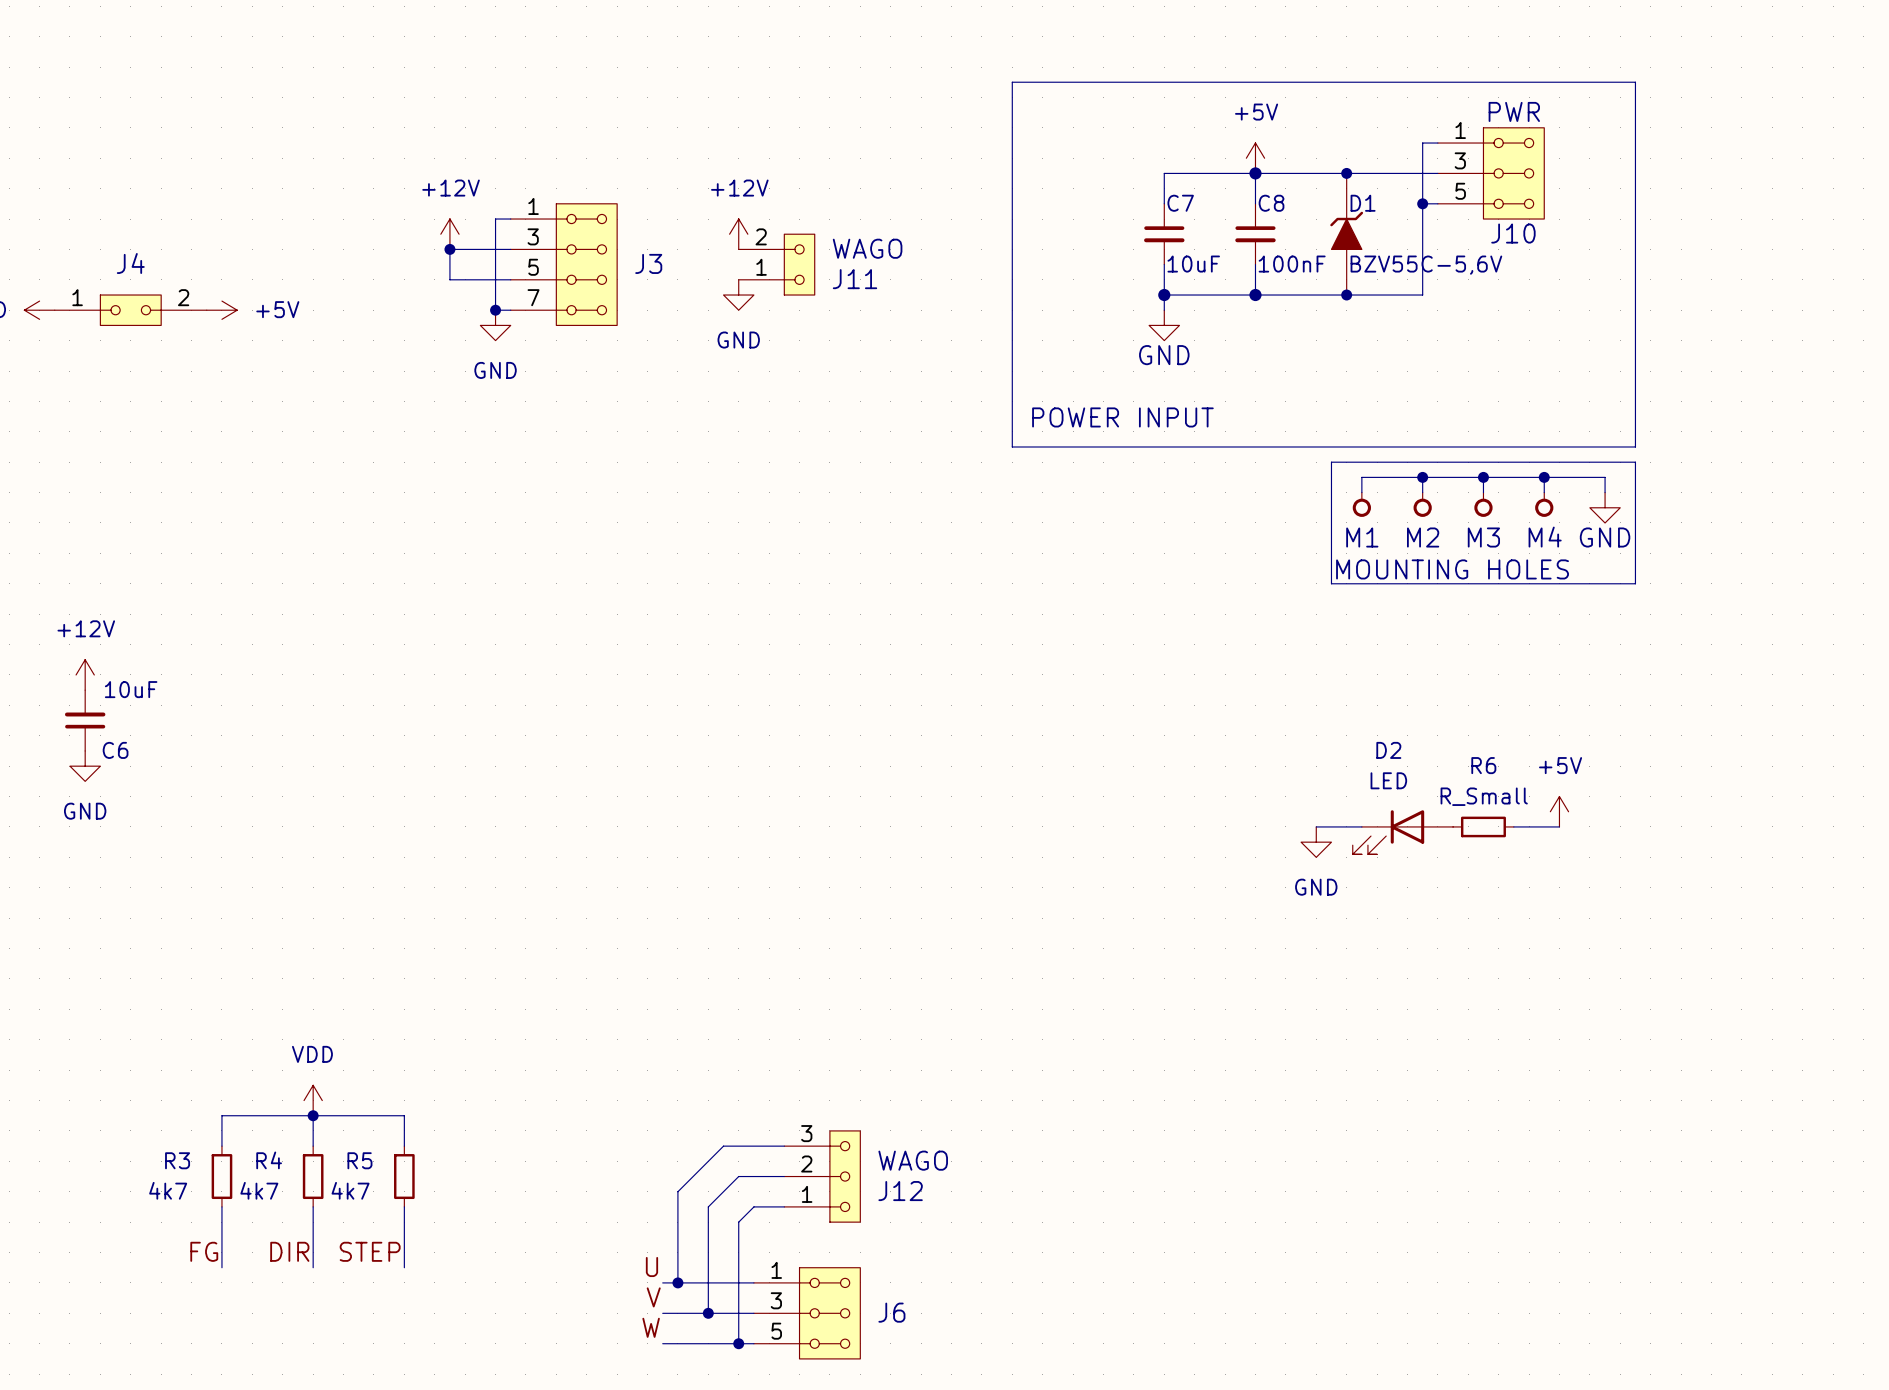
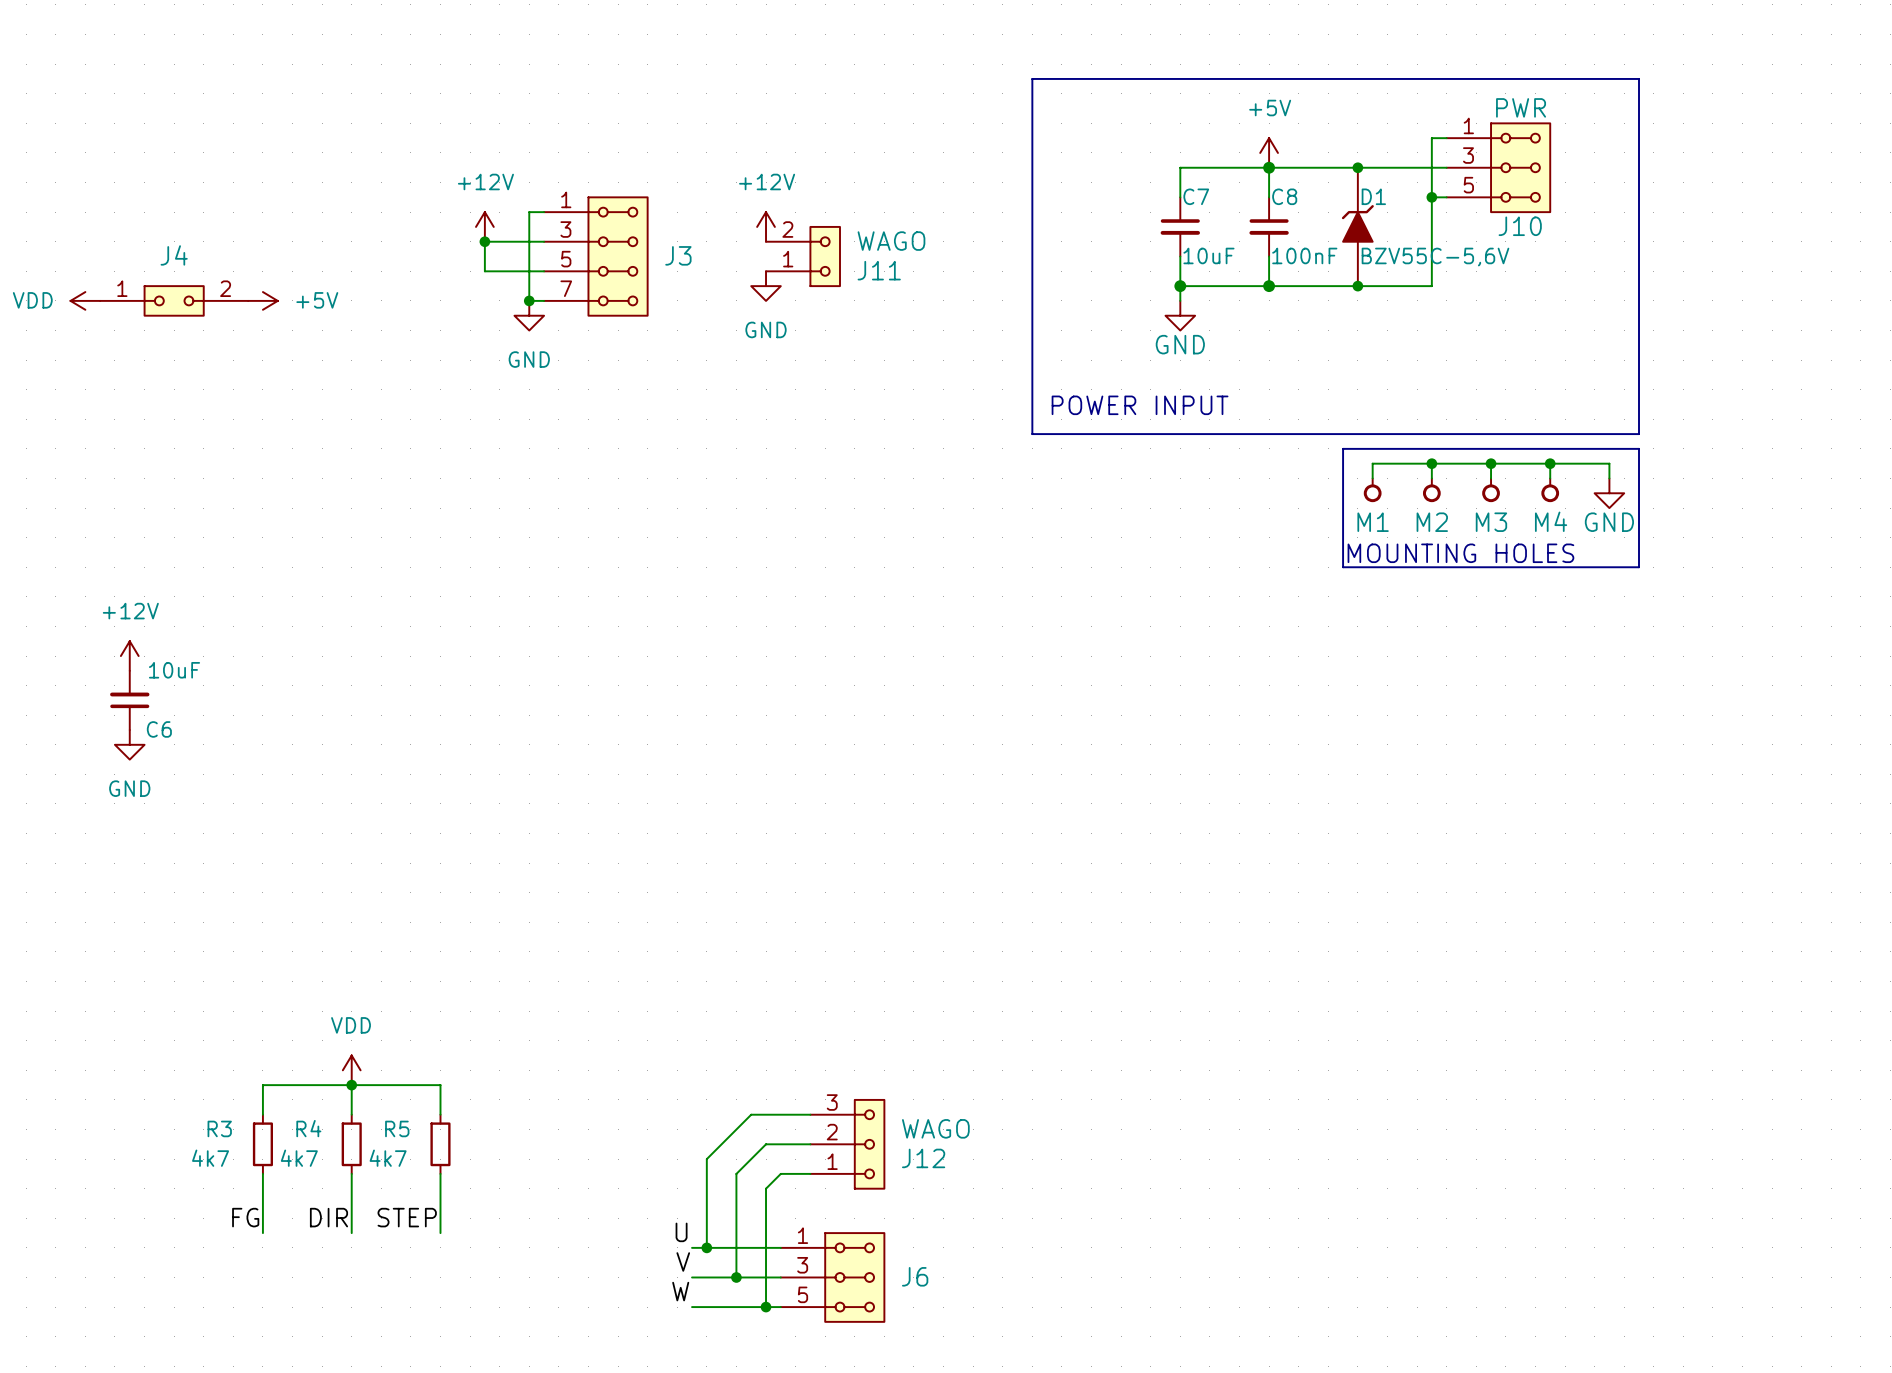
power symbol: +5V (1559, 811) -> none
wire: (1316, 826) (1361, 826) -> none
R6: R_Small (1483, 826) -> none
wire: (1513, 826) (1559, 826) -> none
D2: LED (1402, 832) -> none
power symbol: GND (1316, 842) -> none

